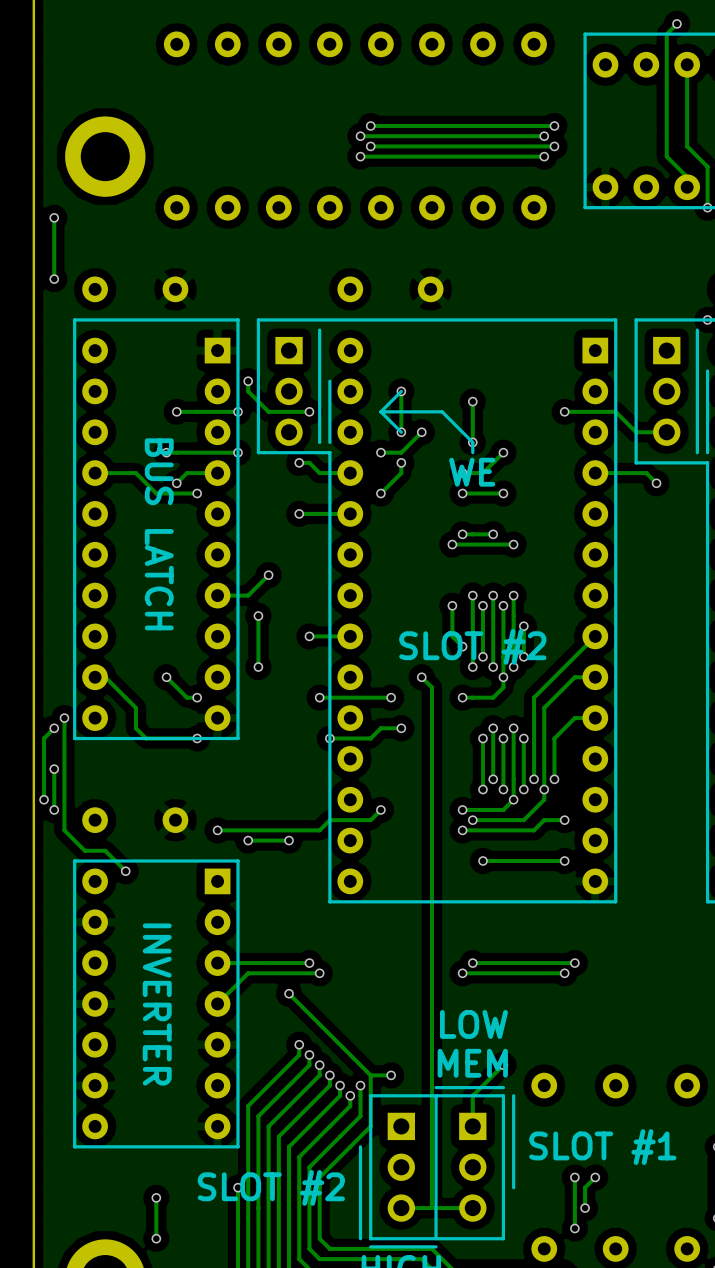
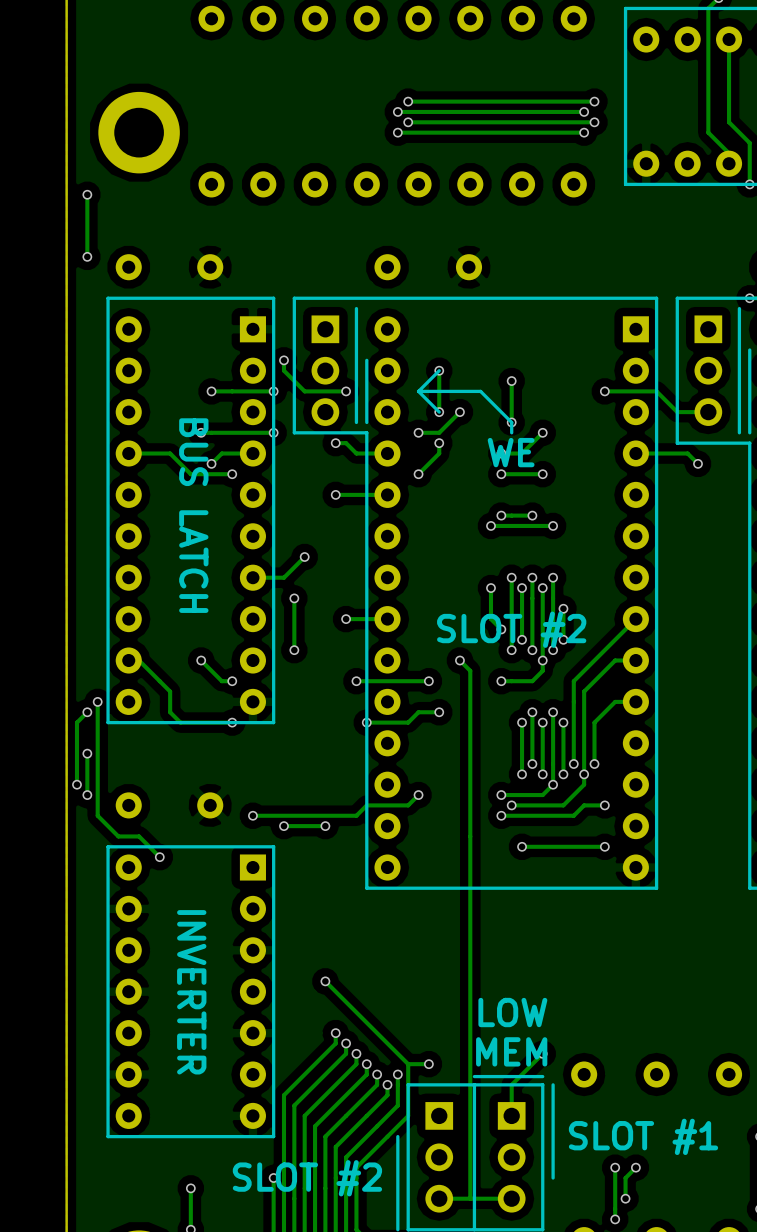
track: (309, 963) (217, 963) -> none
via: (309, 963) -> none
via: (472, 963) -> none
track: (574, 963) (472, 963) -> none
via: (574, 963) -> none
track: (319, 973) (248, 973) (217, 1003) -> none
via: (319, 973) -> none
via: (462, 973) -> none
track: (564, 973) (462, 973) -> none
via: (564, 973) -> none

